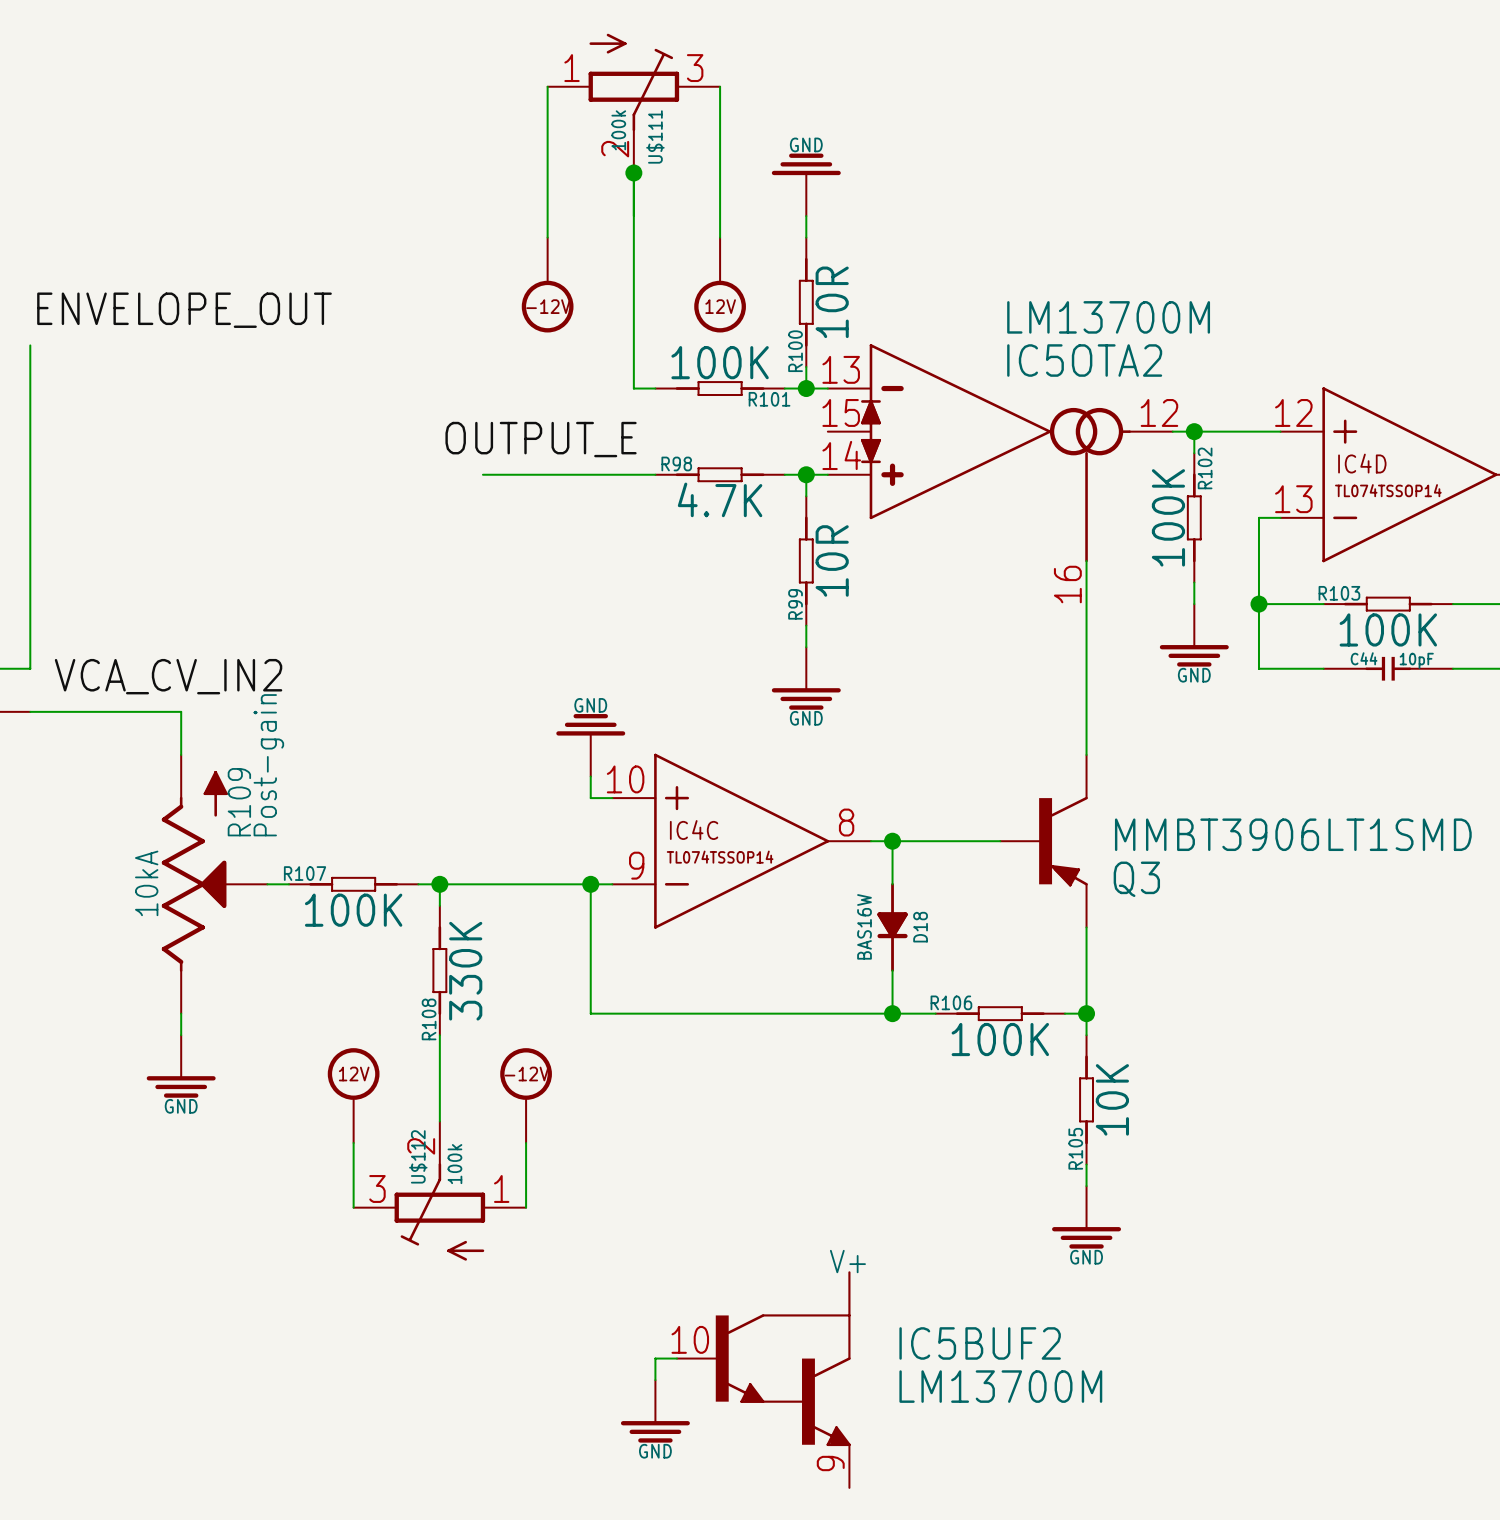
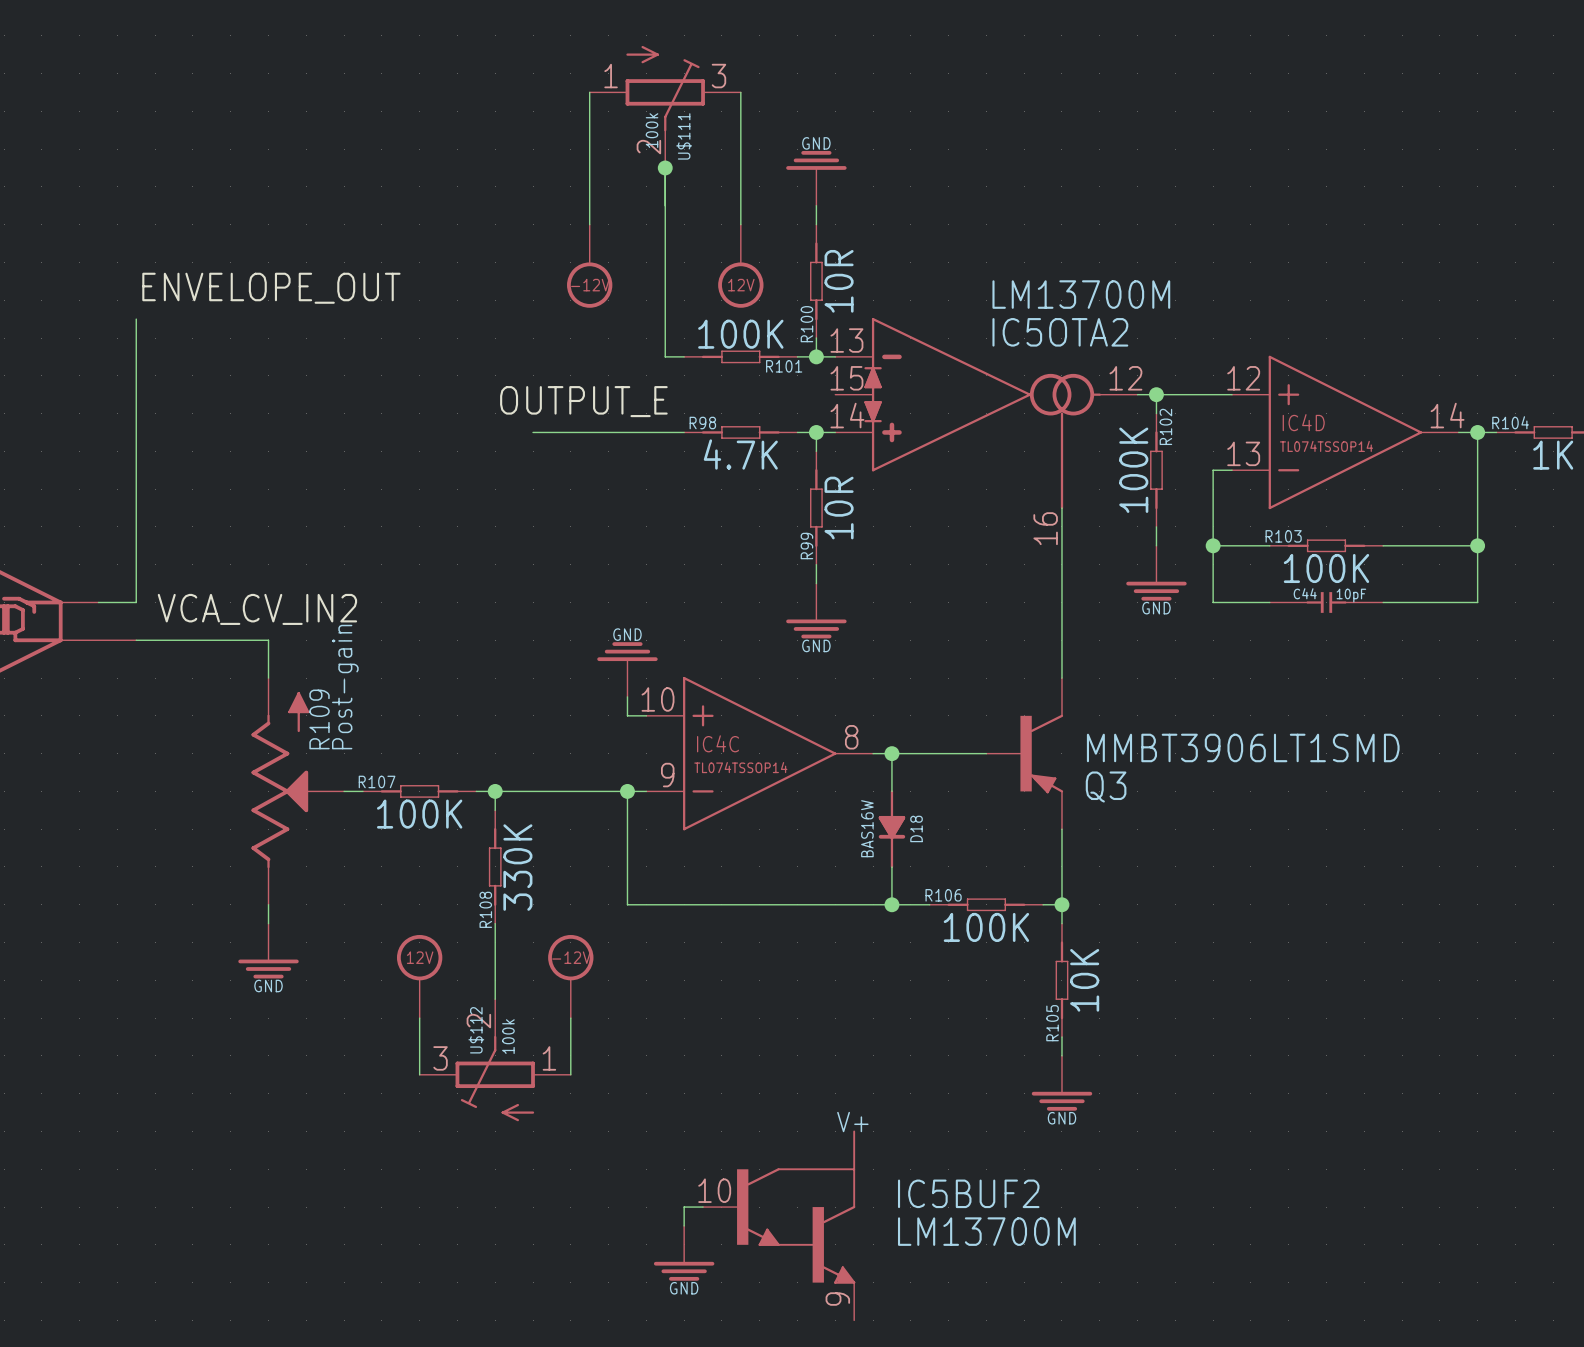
R109 value: 10kA (146, 883) -> none

